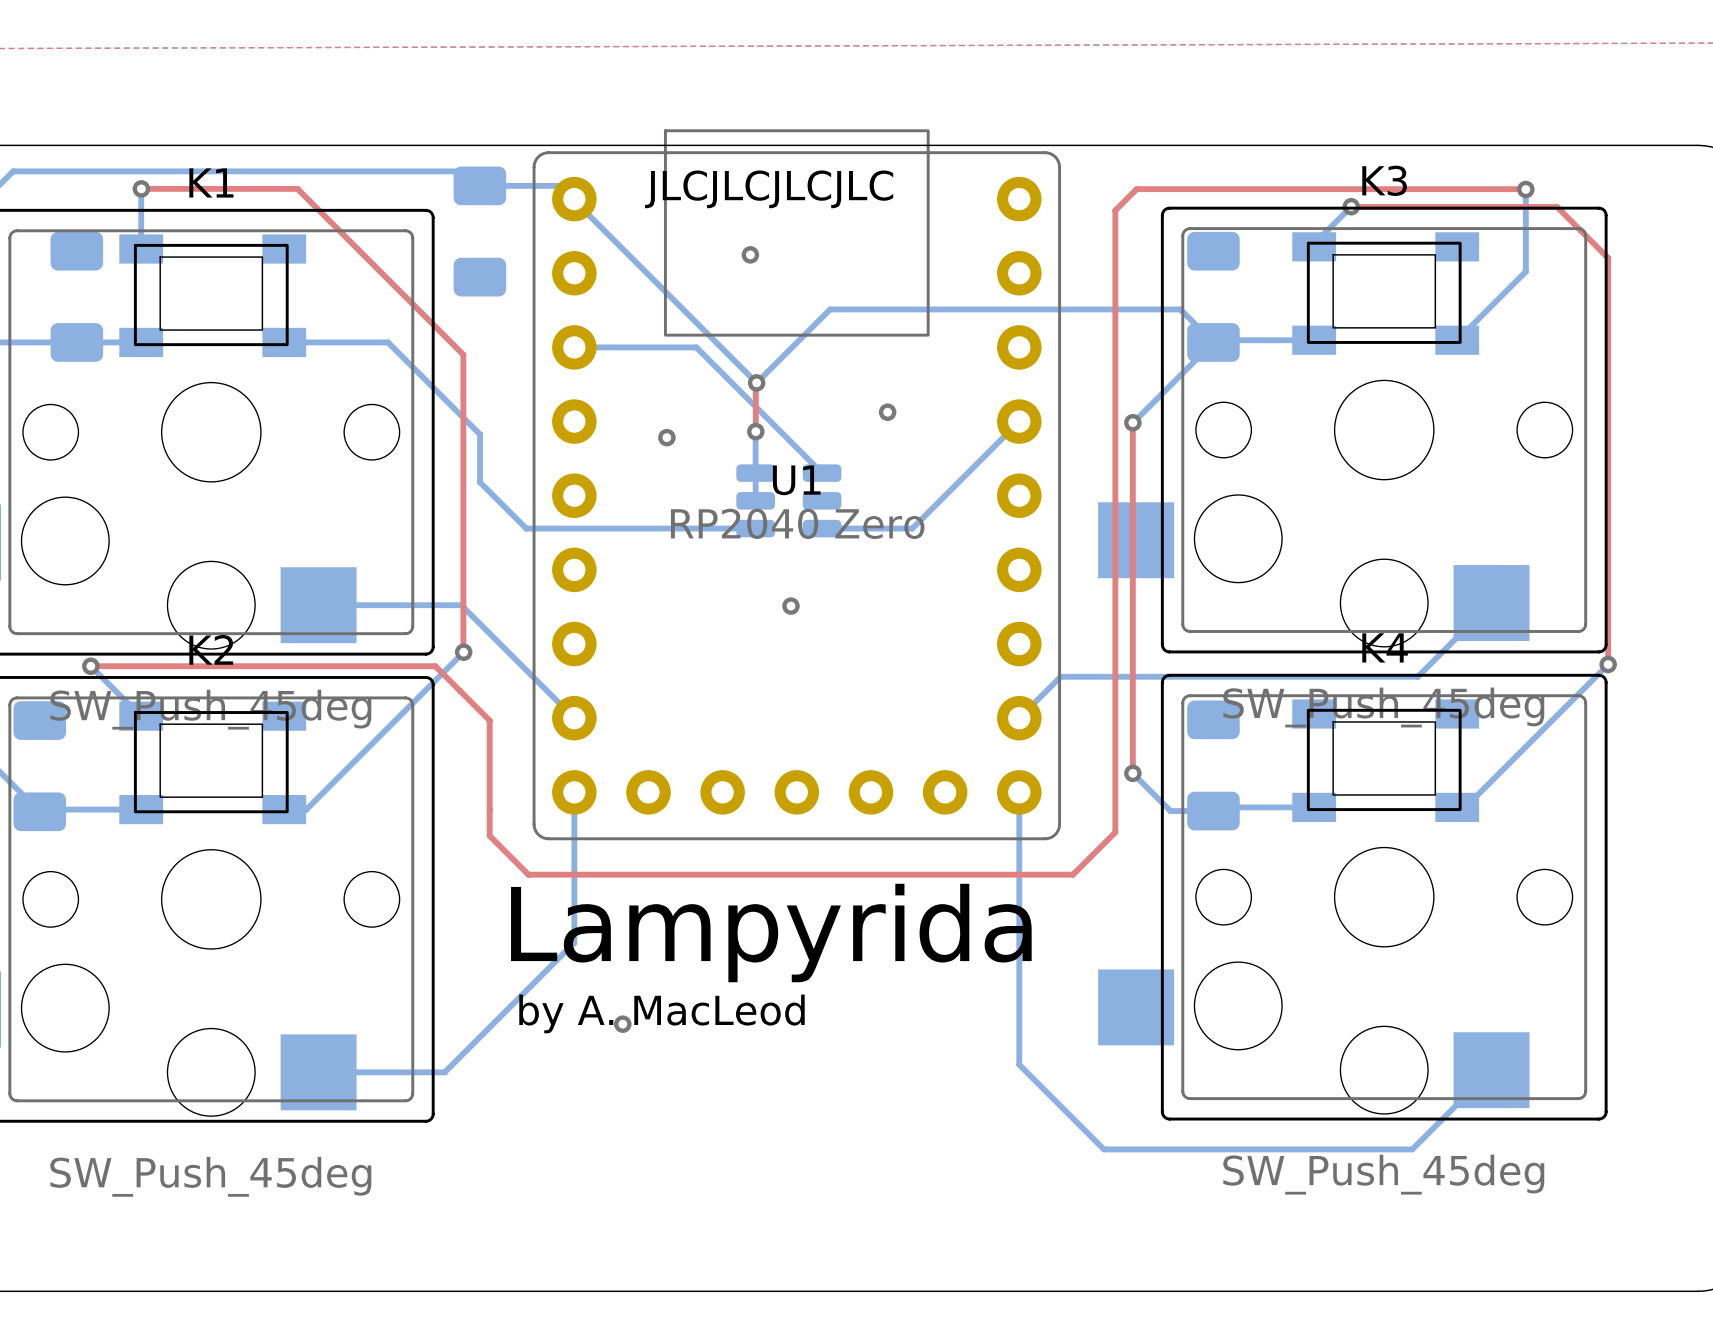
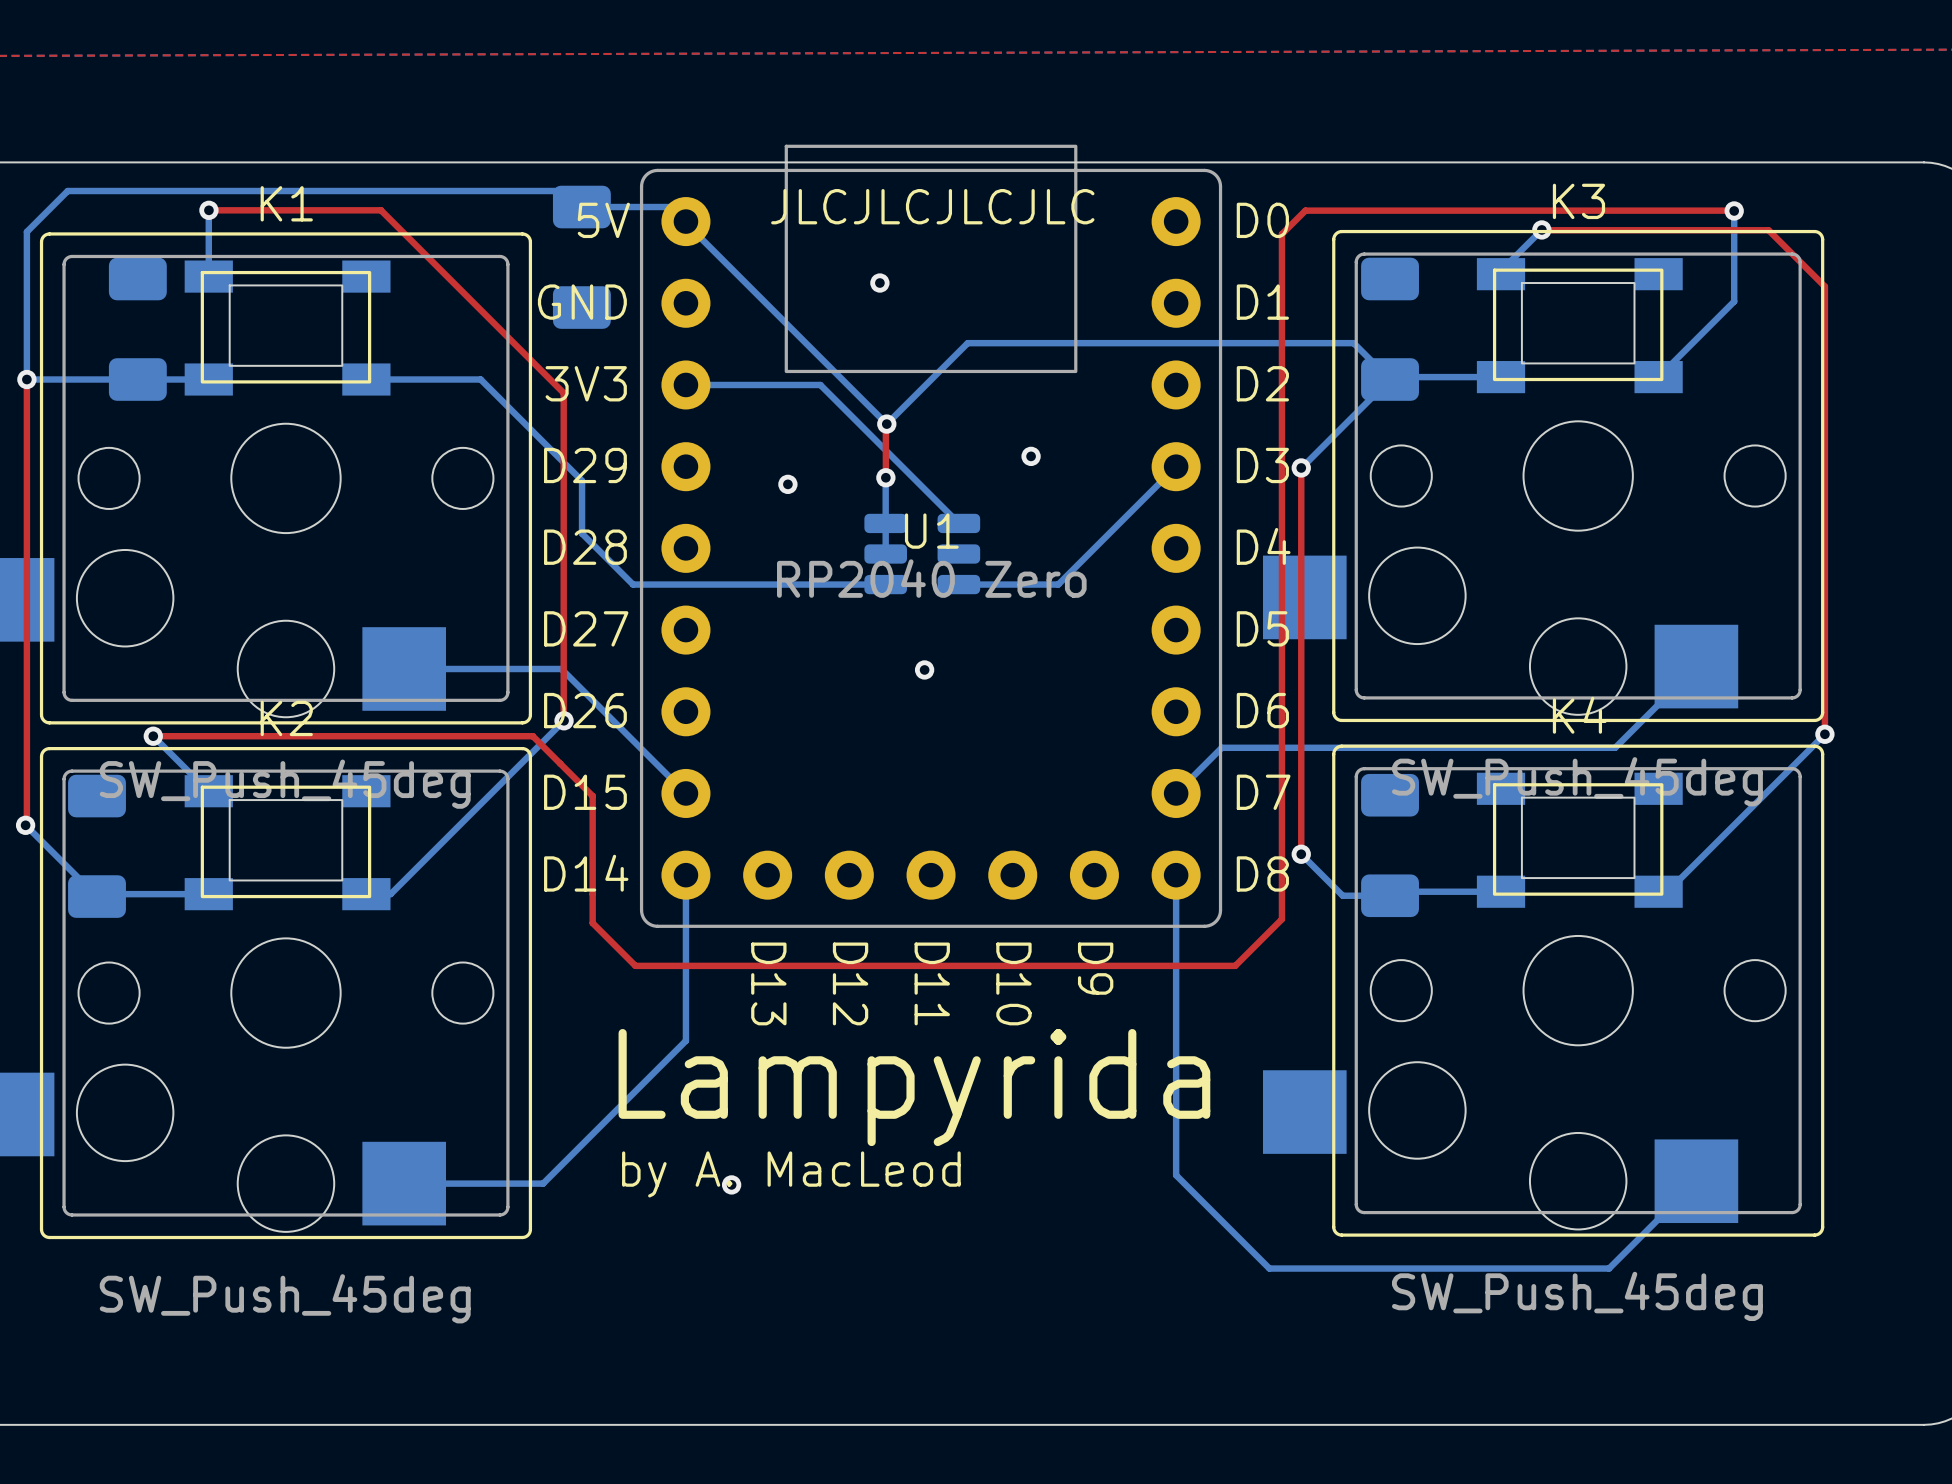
U1 footprint: [532, 129, 1062, 841] -> [639, 144, 1223, 928]
text position: Lampyrida (771, 933) -> Lampyrida (914, 1087)
text position: by A. MacLeod (662, 1013) -> by A. MacLeod (791, 1174)
via position: (622, 1024) -> (731, 1184)

